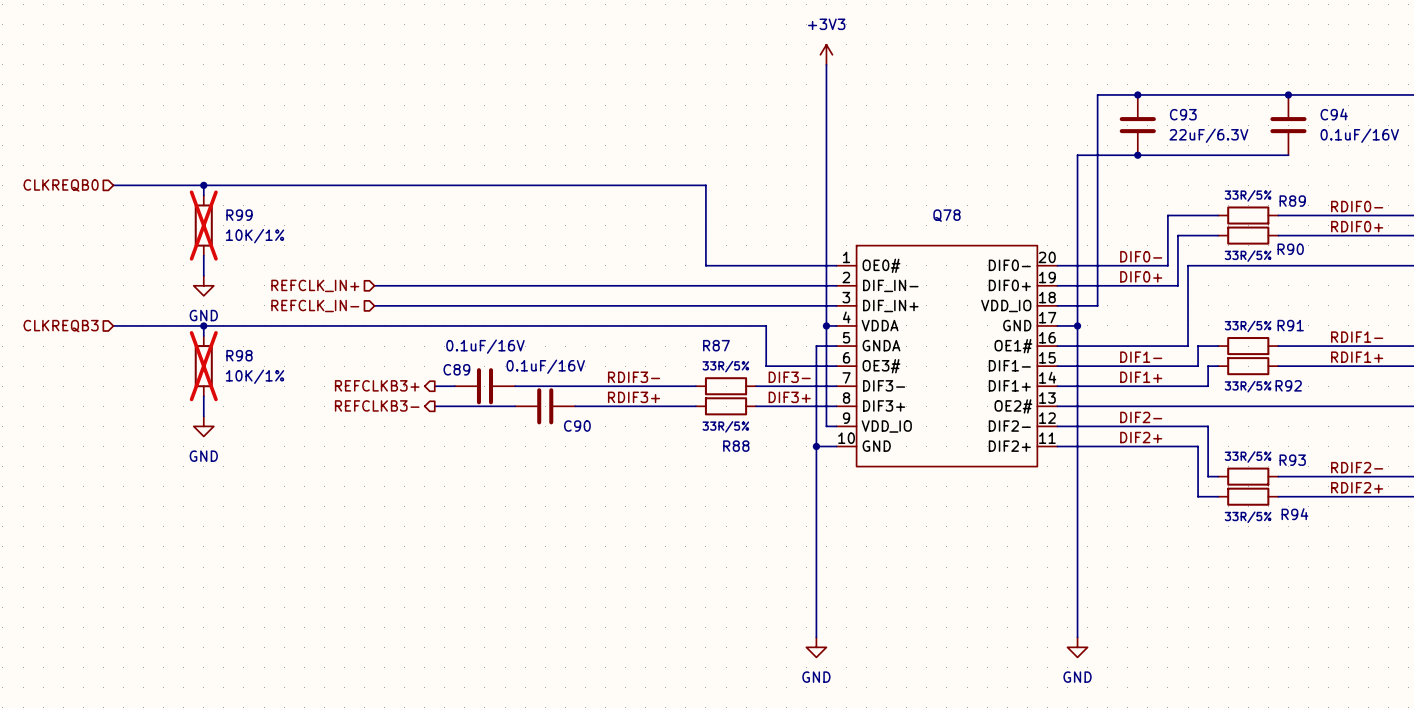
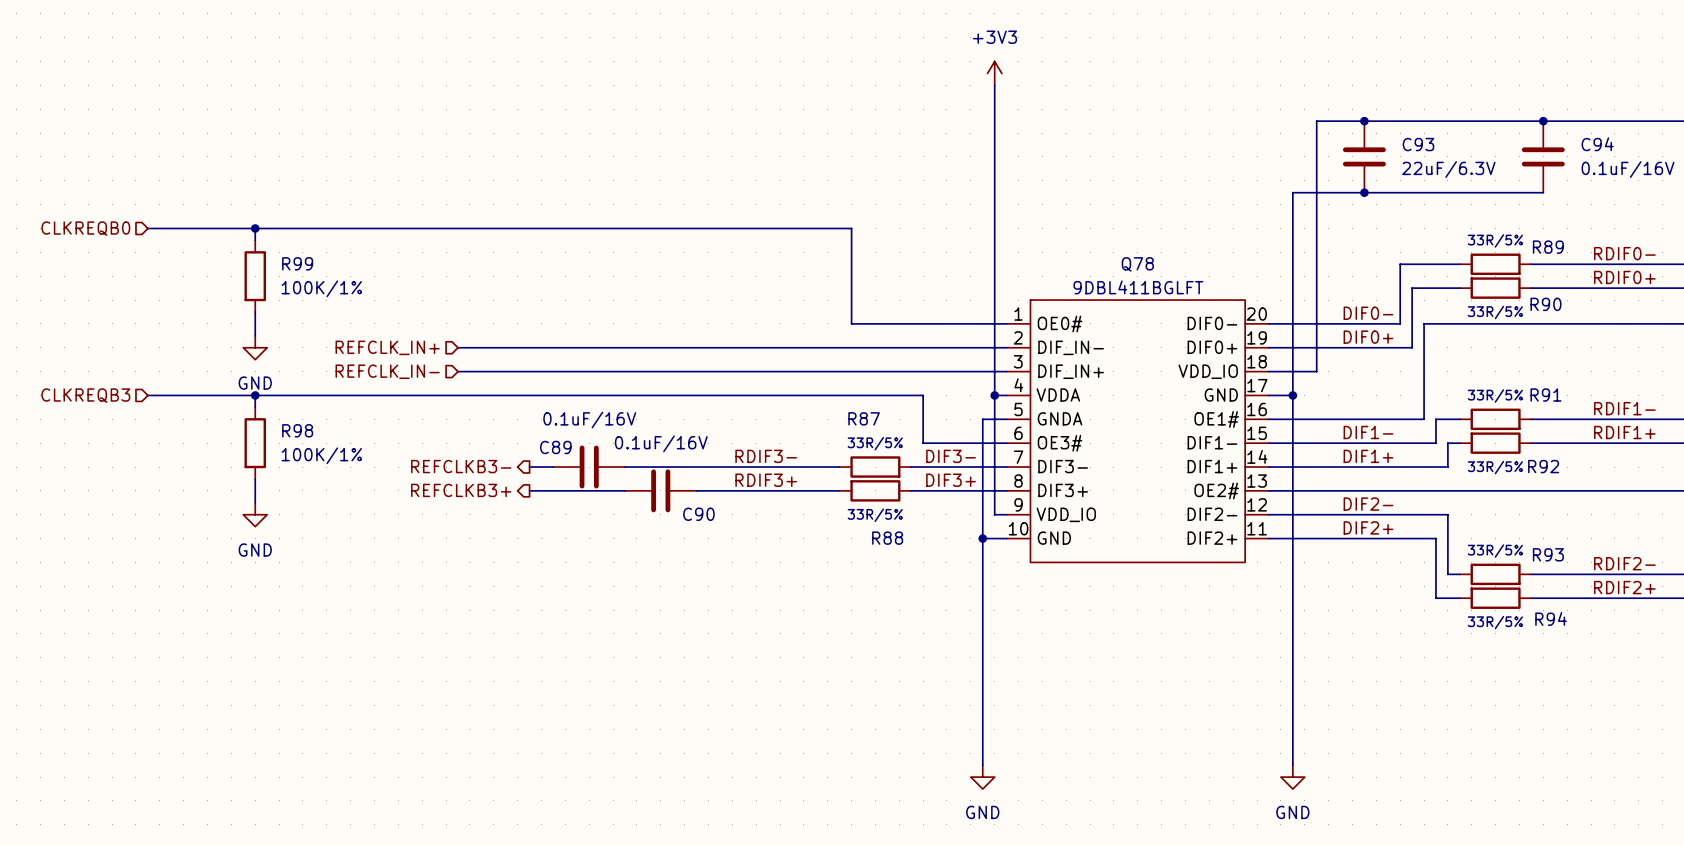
R99 do-not-place cross: (203, 225) -> none
Q78 value: none -> 9DBL411BGLFT (1138, 287)
R99 value: 10K/1% (255, 236) -> 100K/1% (321, 288)
R98 do-not-place cross: (203, 366) -> none
R98 value: 10K/1% (255, 376) -> 100K/1% (321, 455)
hierarchical label: REFCLKB3+ (377, 385) -> REFCLKB3- (461, 466)
hierarchical label: REFCLKB3- (377, 405) -> REFCLKB3+ (461, 490)

